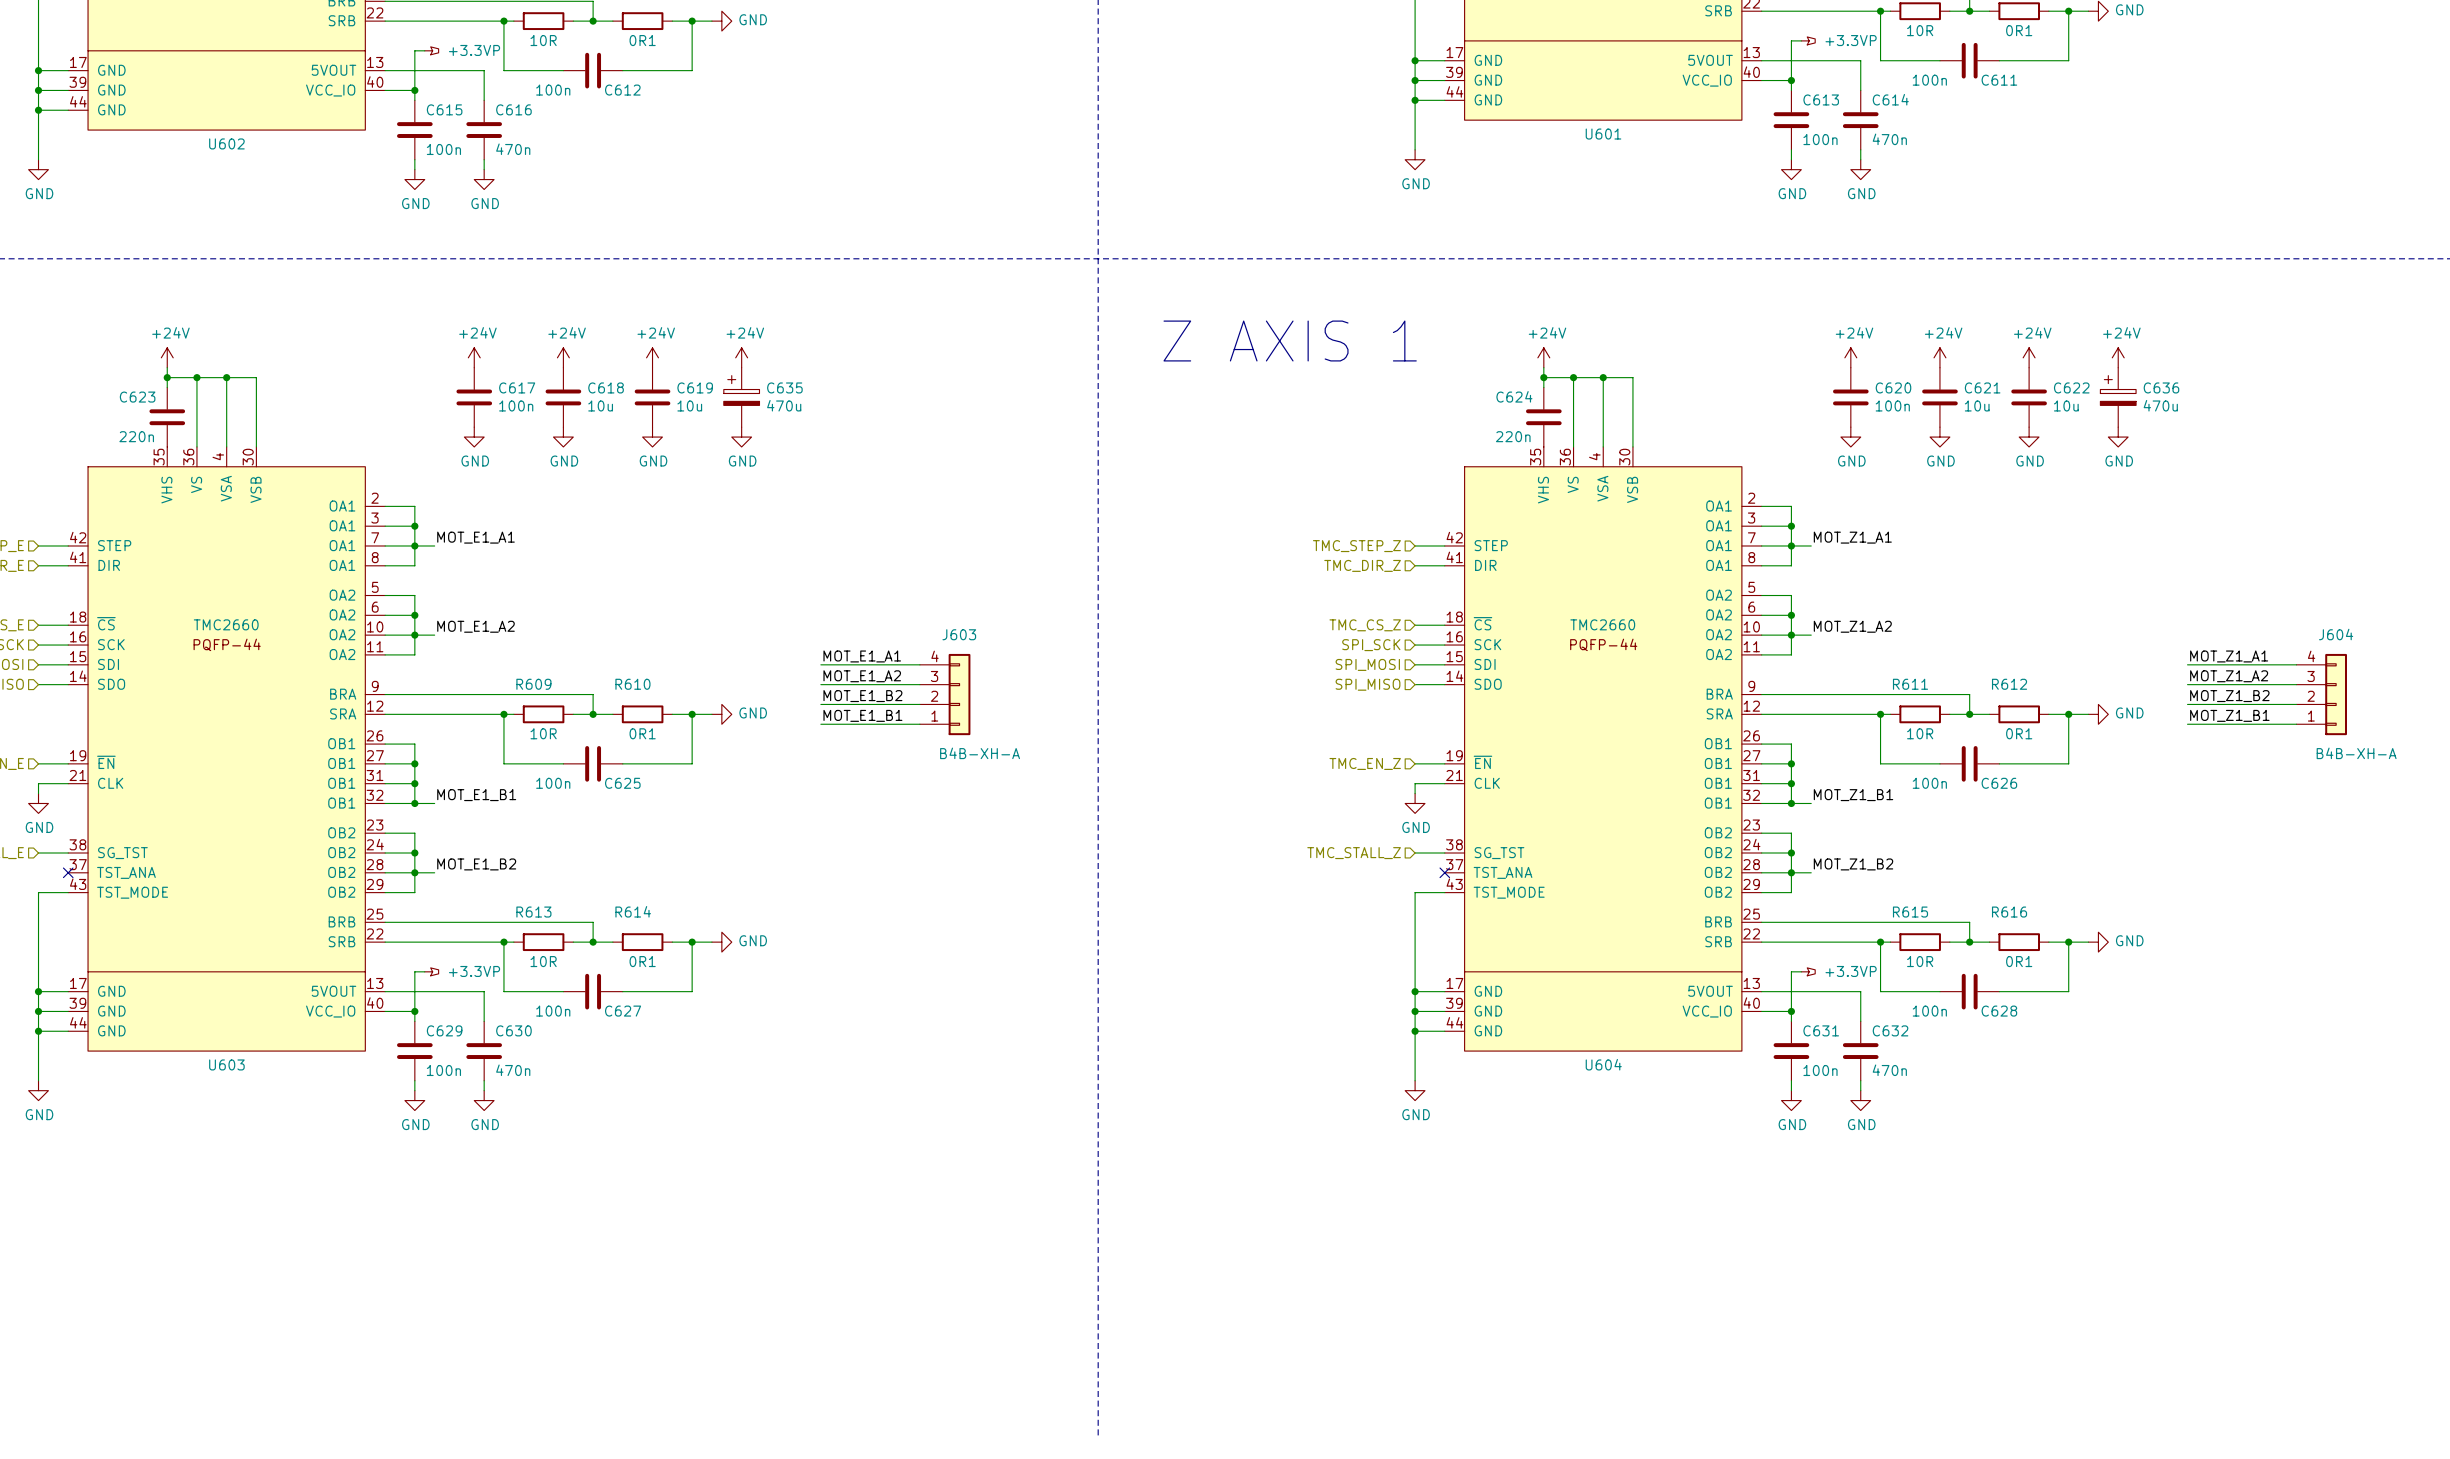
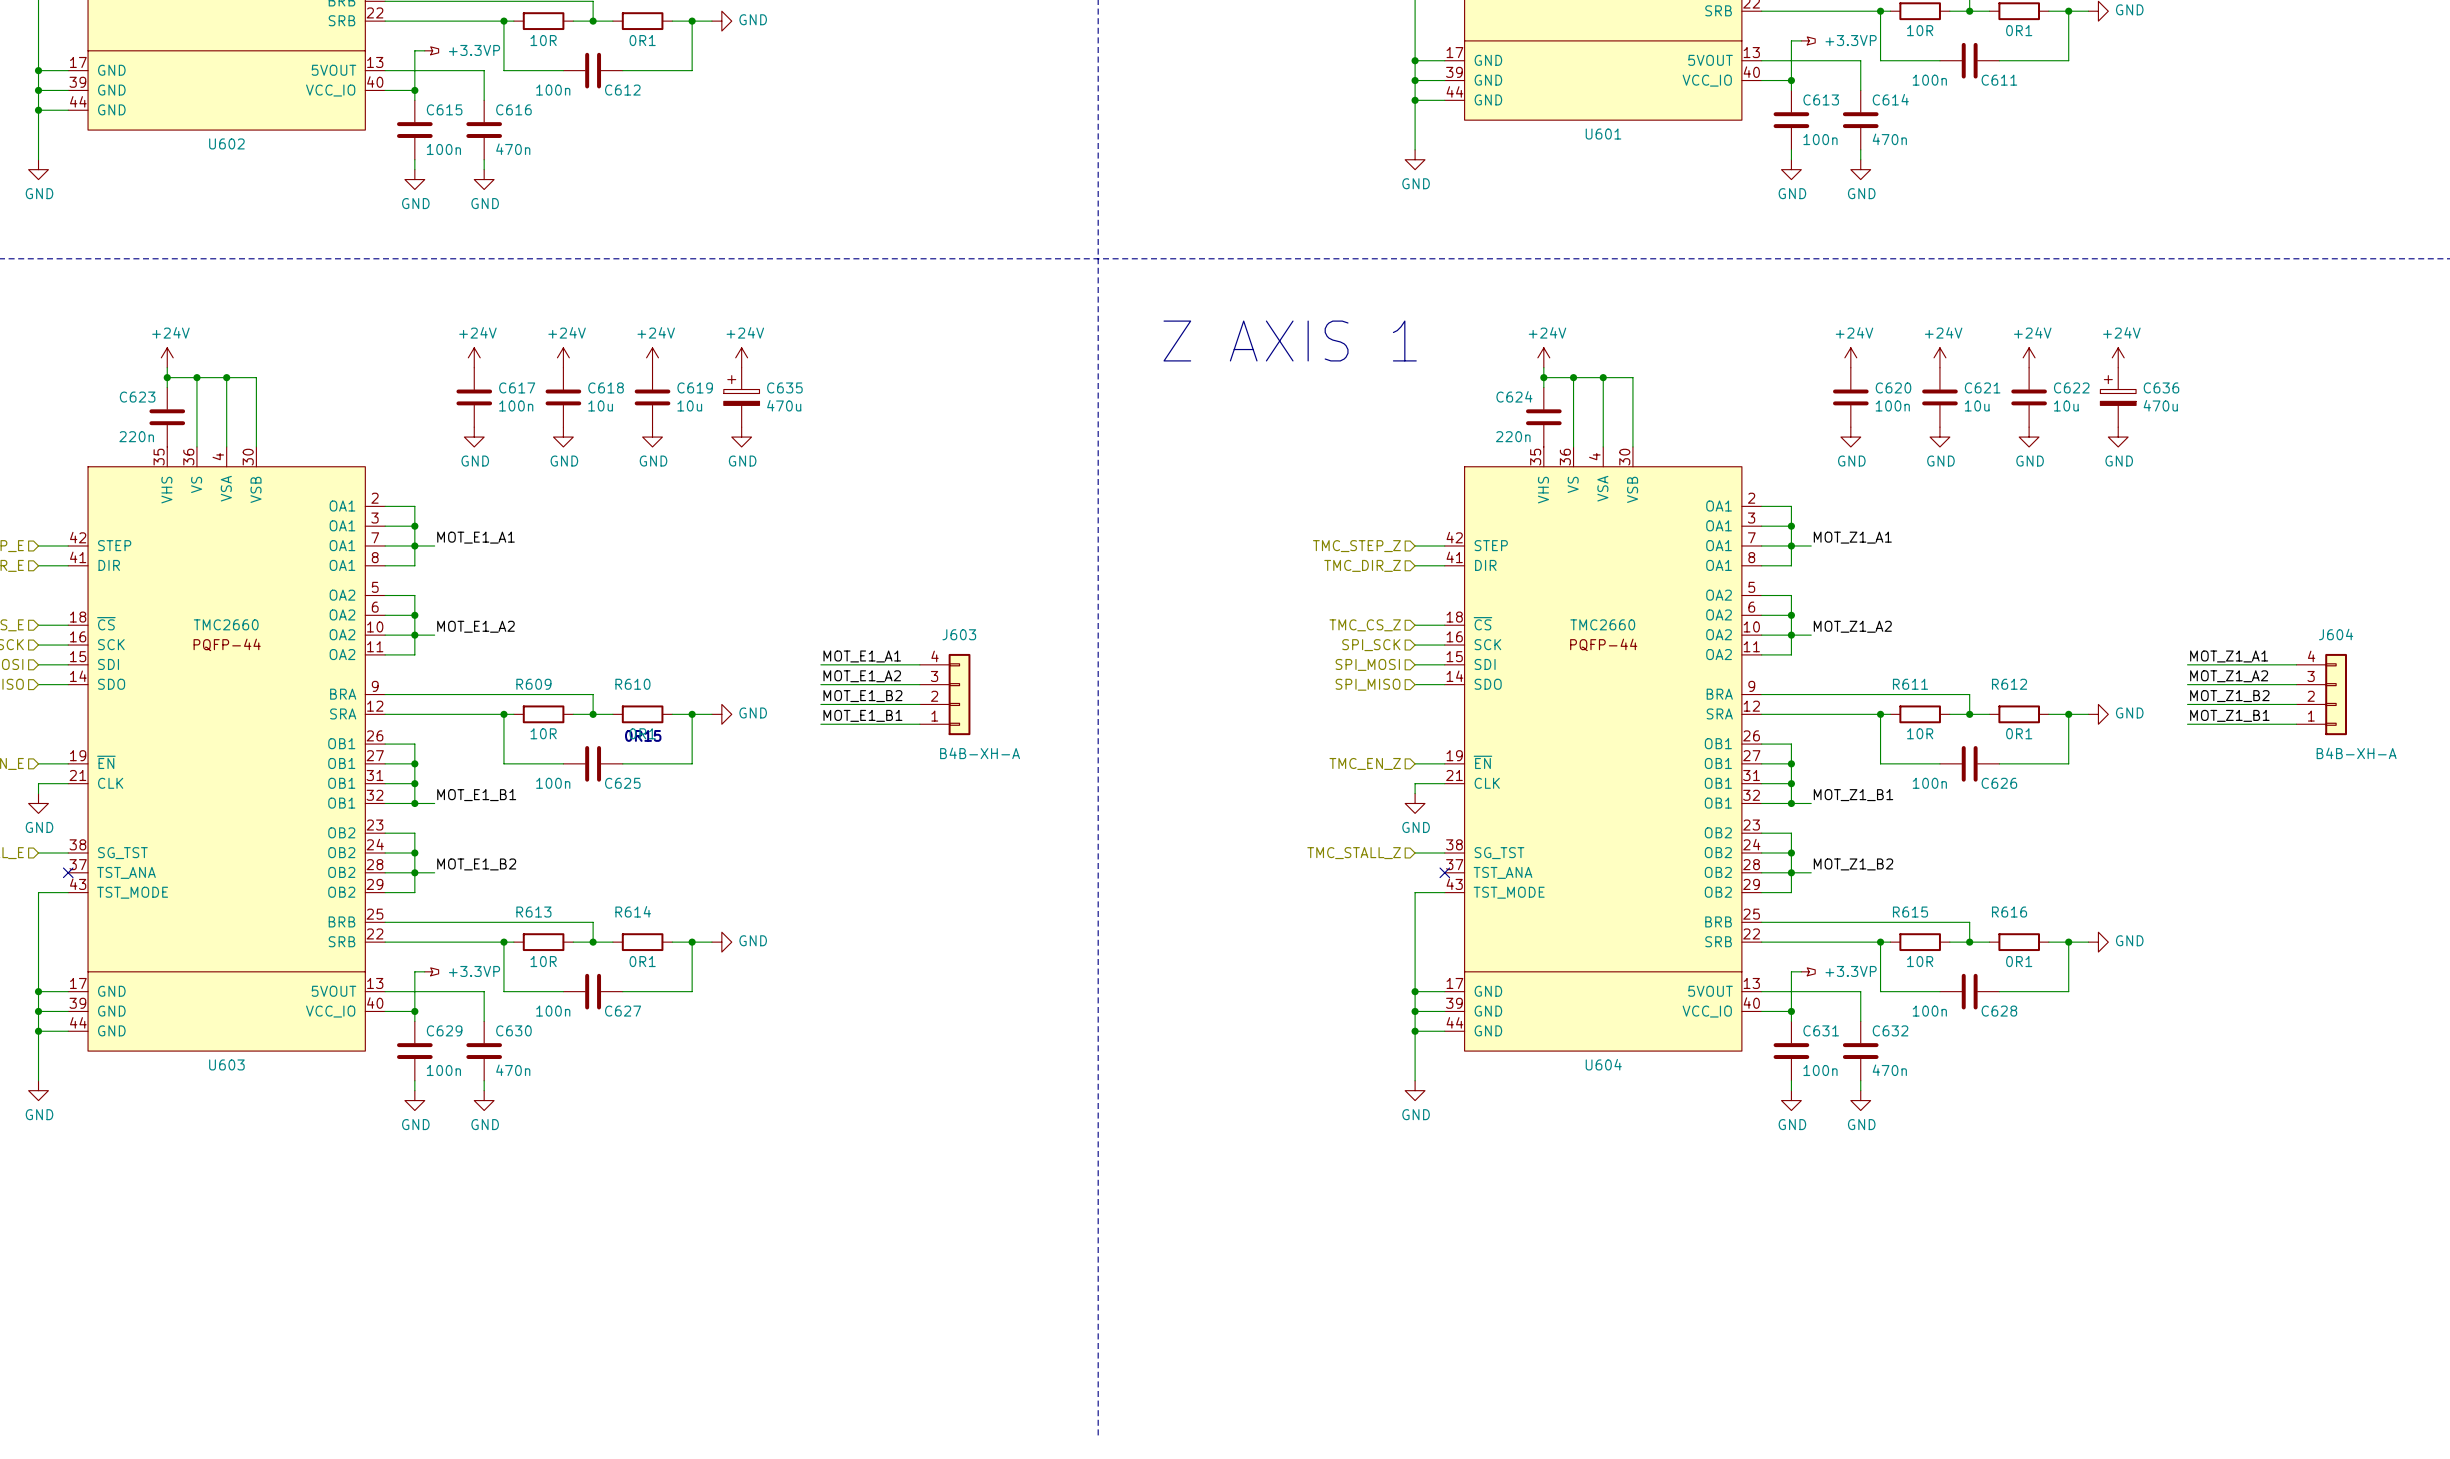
text: none -> 0R15 (643, 735)

